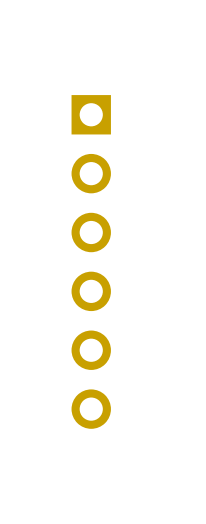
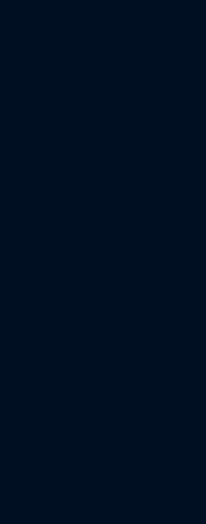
part: (91, 261) -> none

